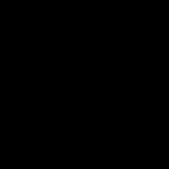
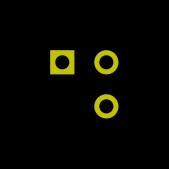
part: none -> (84, 84)

